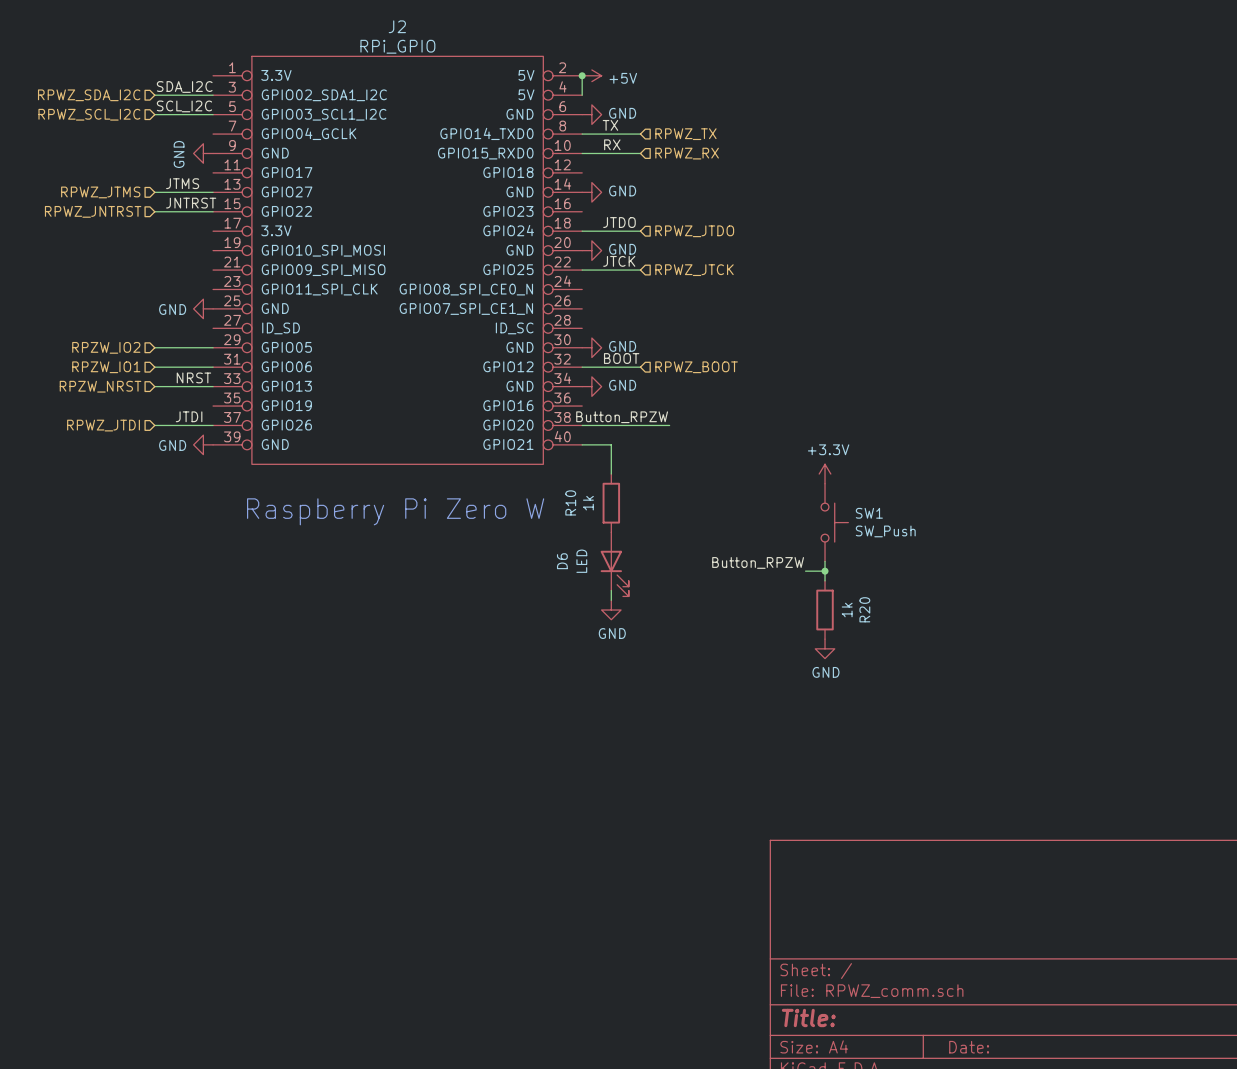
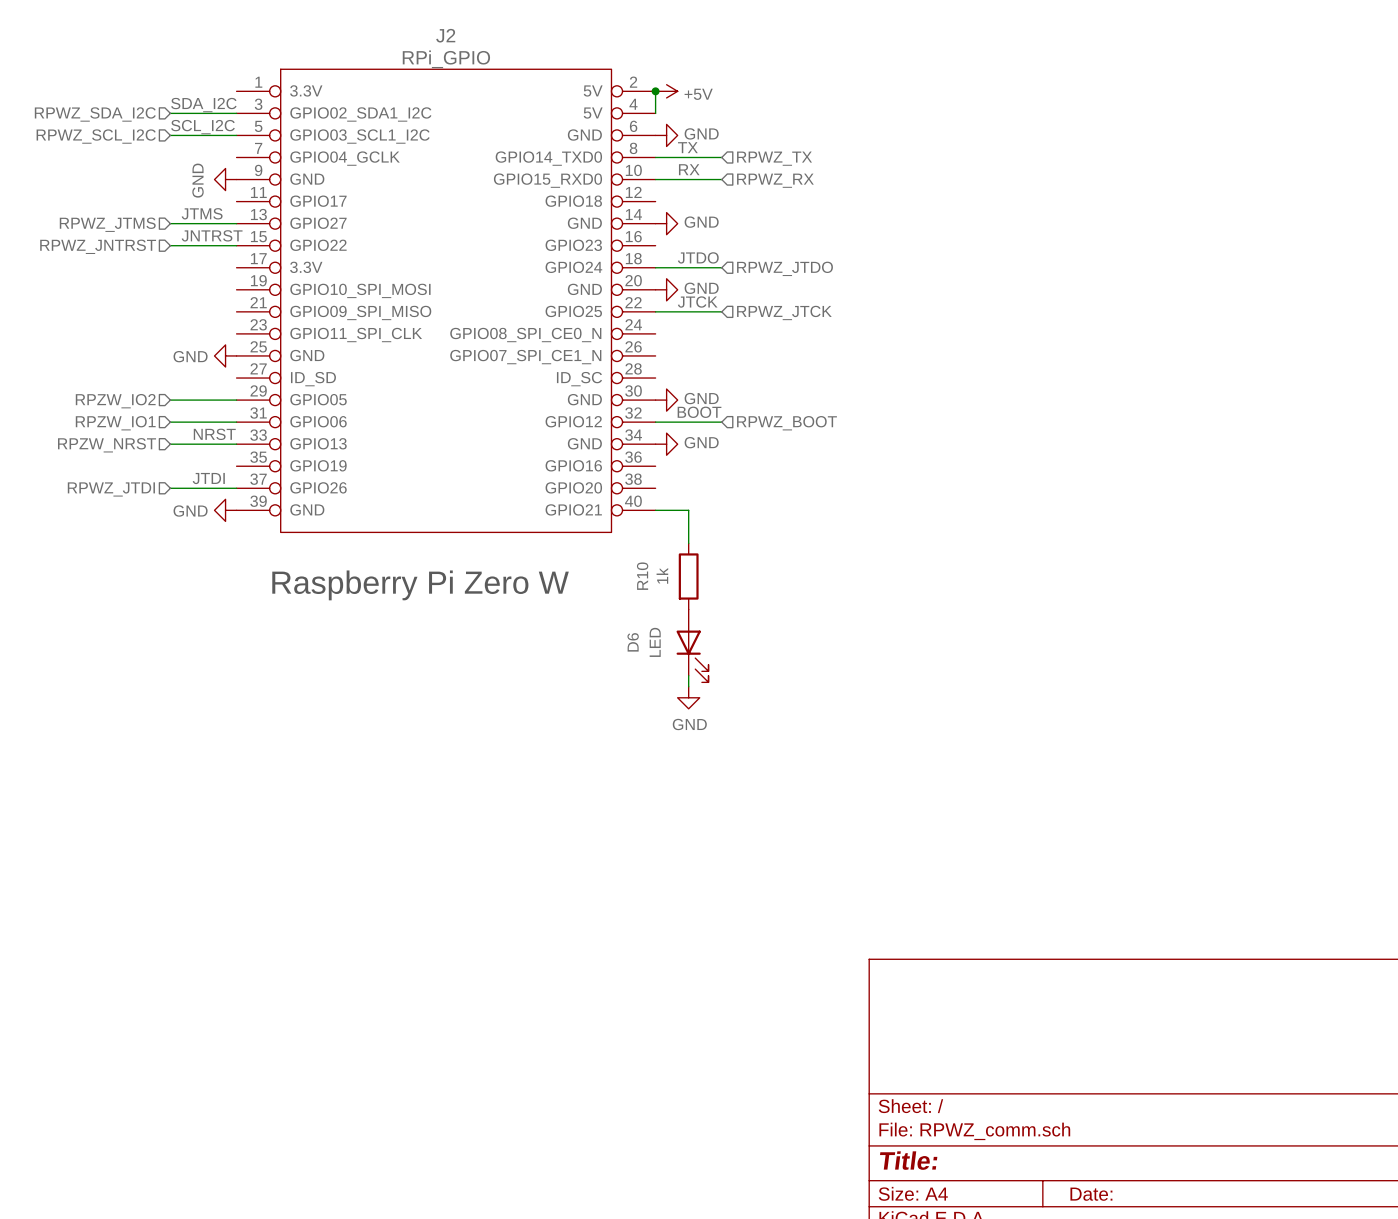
label: Button_RPZW (622, 417) -> none
wire: (582, 425) (669, 425) -> none
power symbol: +3.3V (825, 474) -> none
SW1: SW_Push (834, 522) -> none
wire: (825, 561) (825, 580) -> none
label: Button_RPZW (758, 562) -> none
wire: (805, 571) (825, 571) -> none
junction: (825, 571) -> none
R20: 1k (825, 610) -> none
power symbol: GND (825, 648) -> none

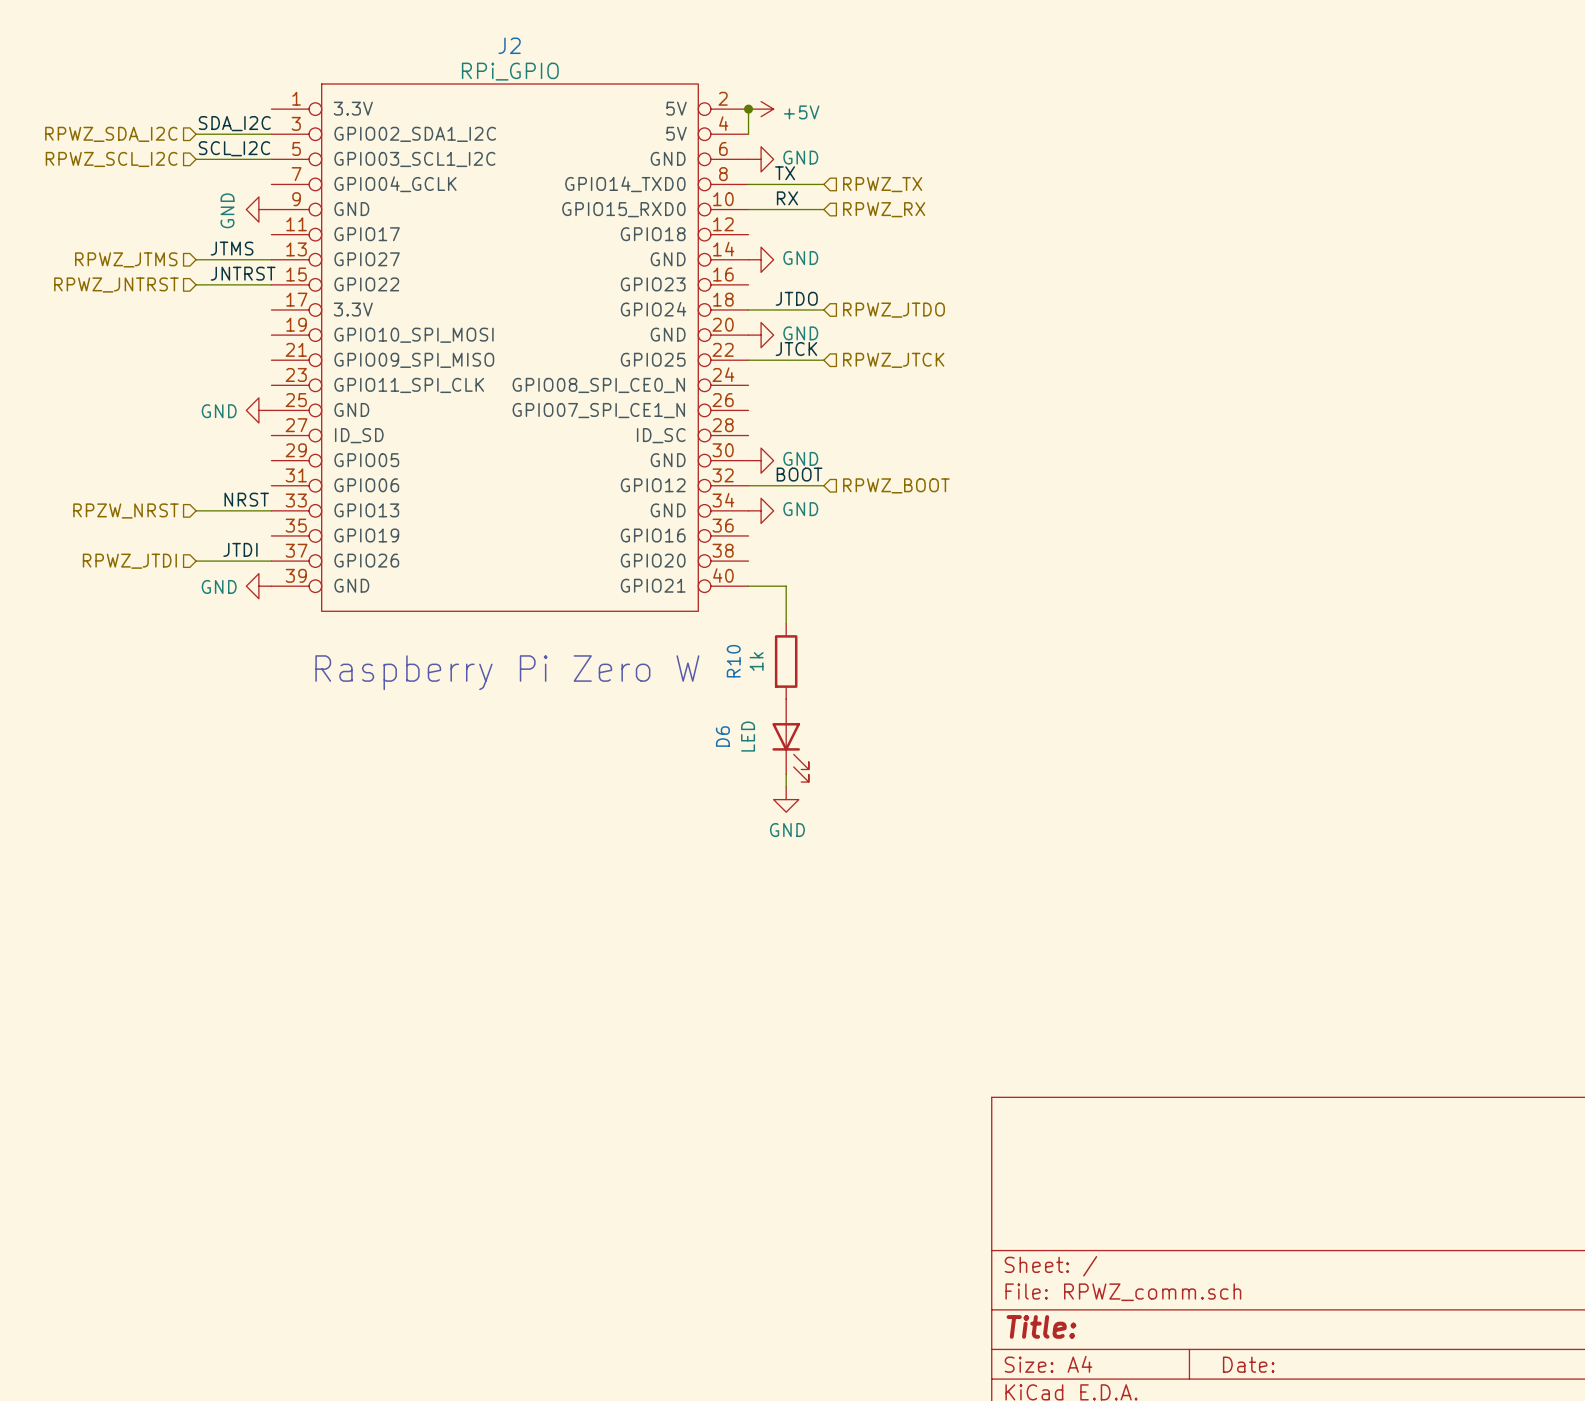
wire: (170, 400) (236, 400) -> none
hierarchical label: RPZW_IO2 (115, 401) -> none
wire: (170, 422) (236, 422) -> none
hierarchical label: RPZW_IO1 (115, 423) -> none

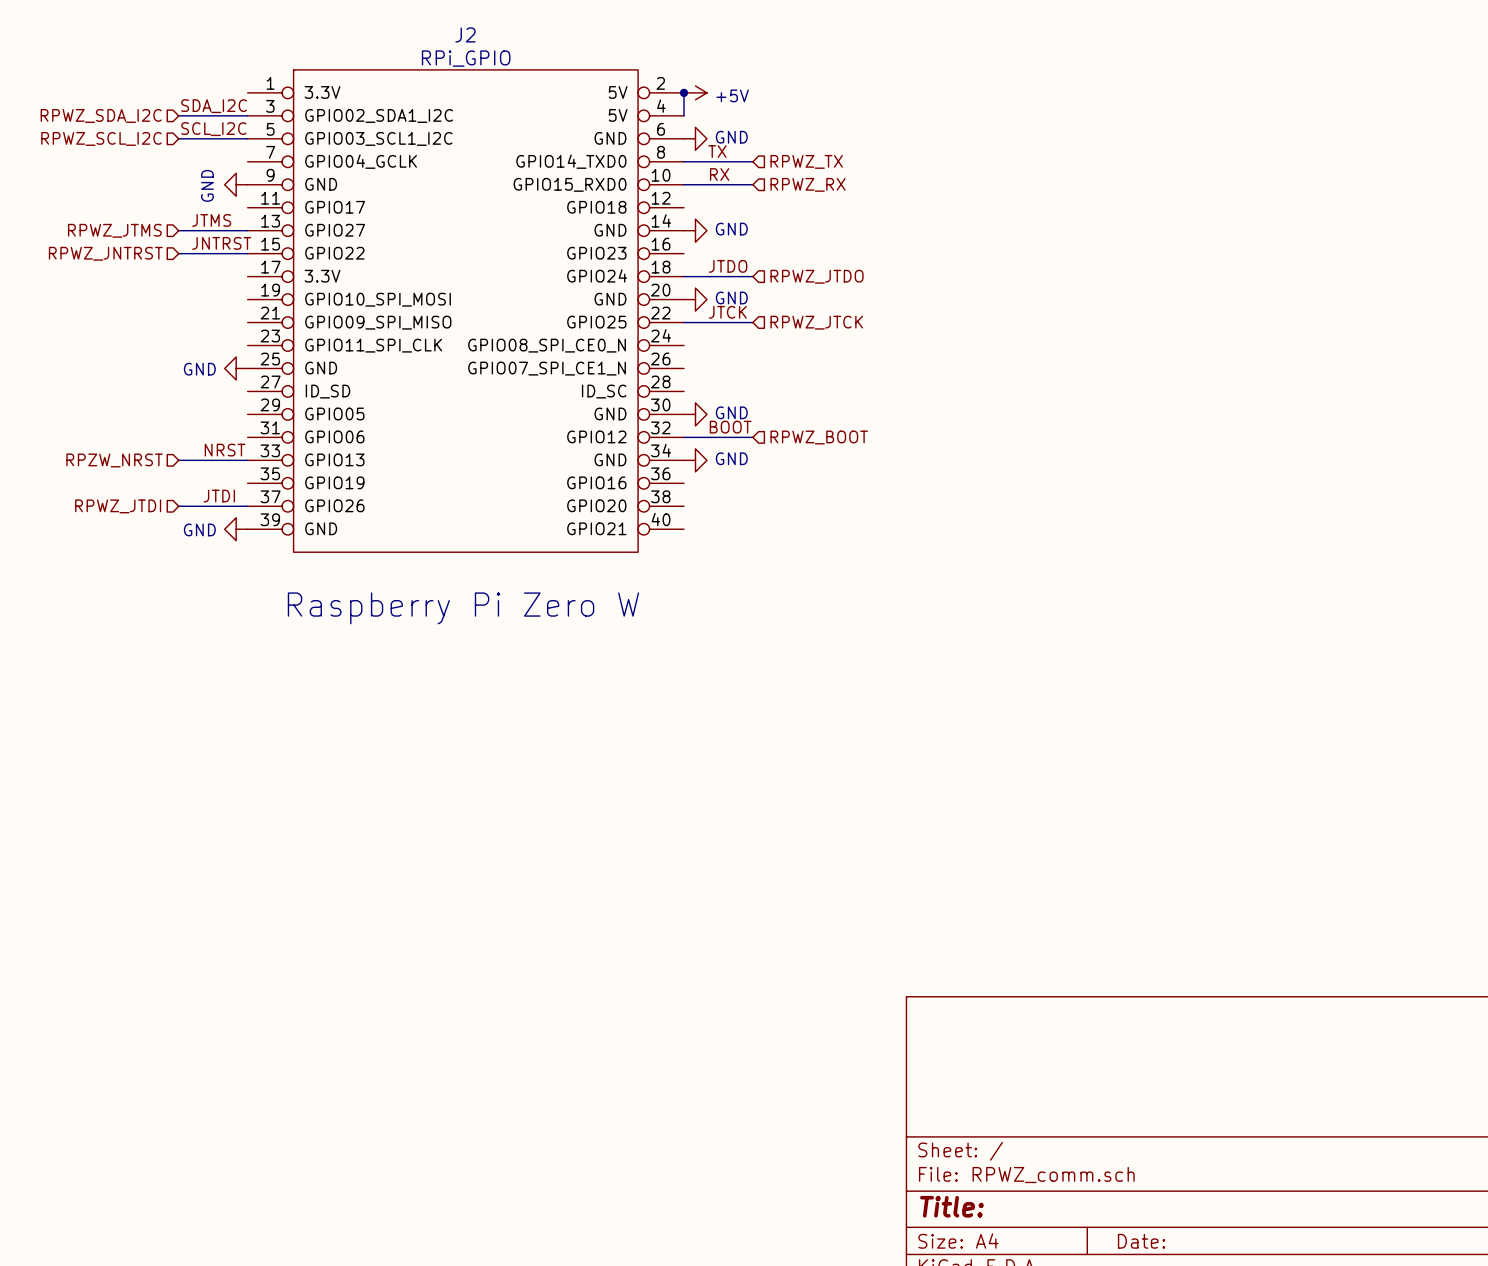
wire: (748, 586) (786, 586) (786, 623) -> none
R10: 1k (786, 661) -> none
D6: LED (790, 740) -> none
wire: (786, 774) (786, 787) -> none
power symbol: GND (786, 799) -> none

